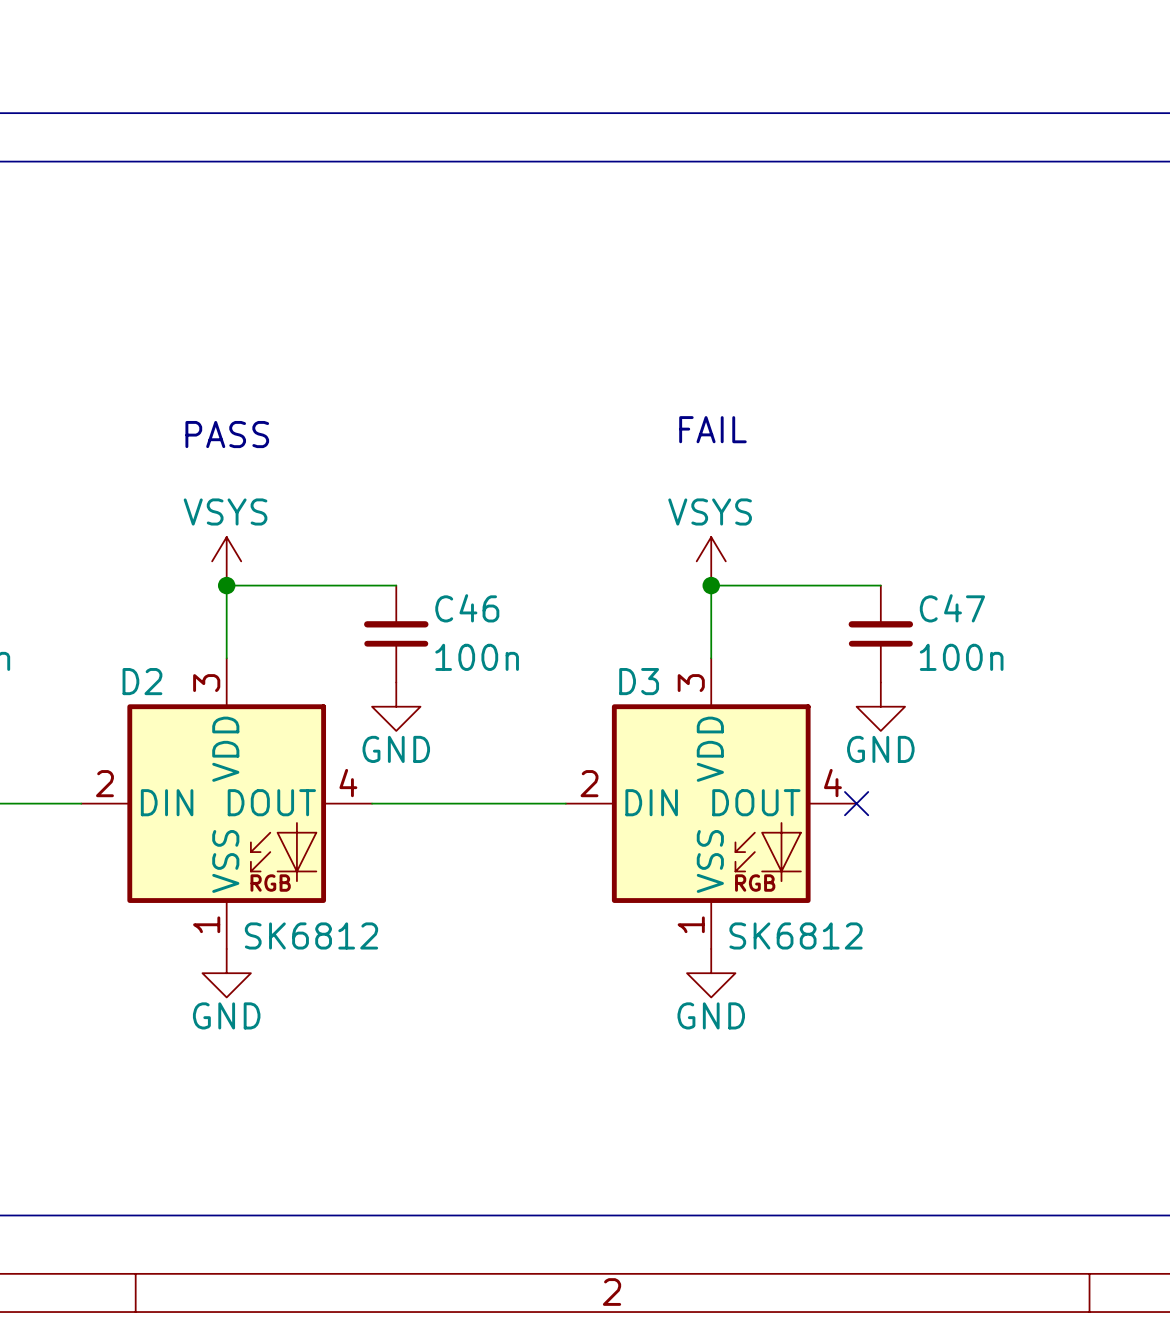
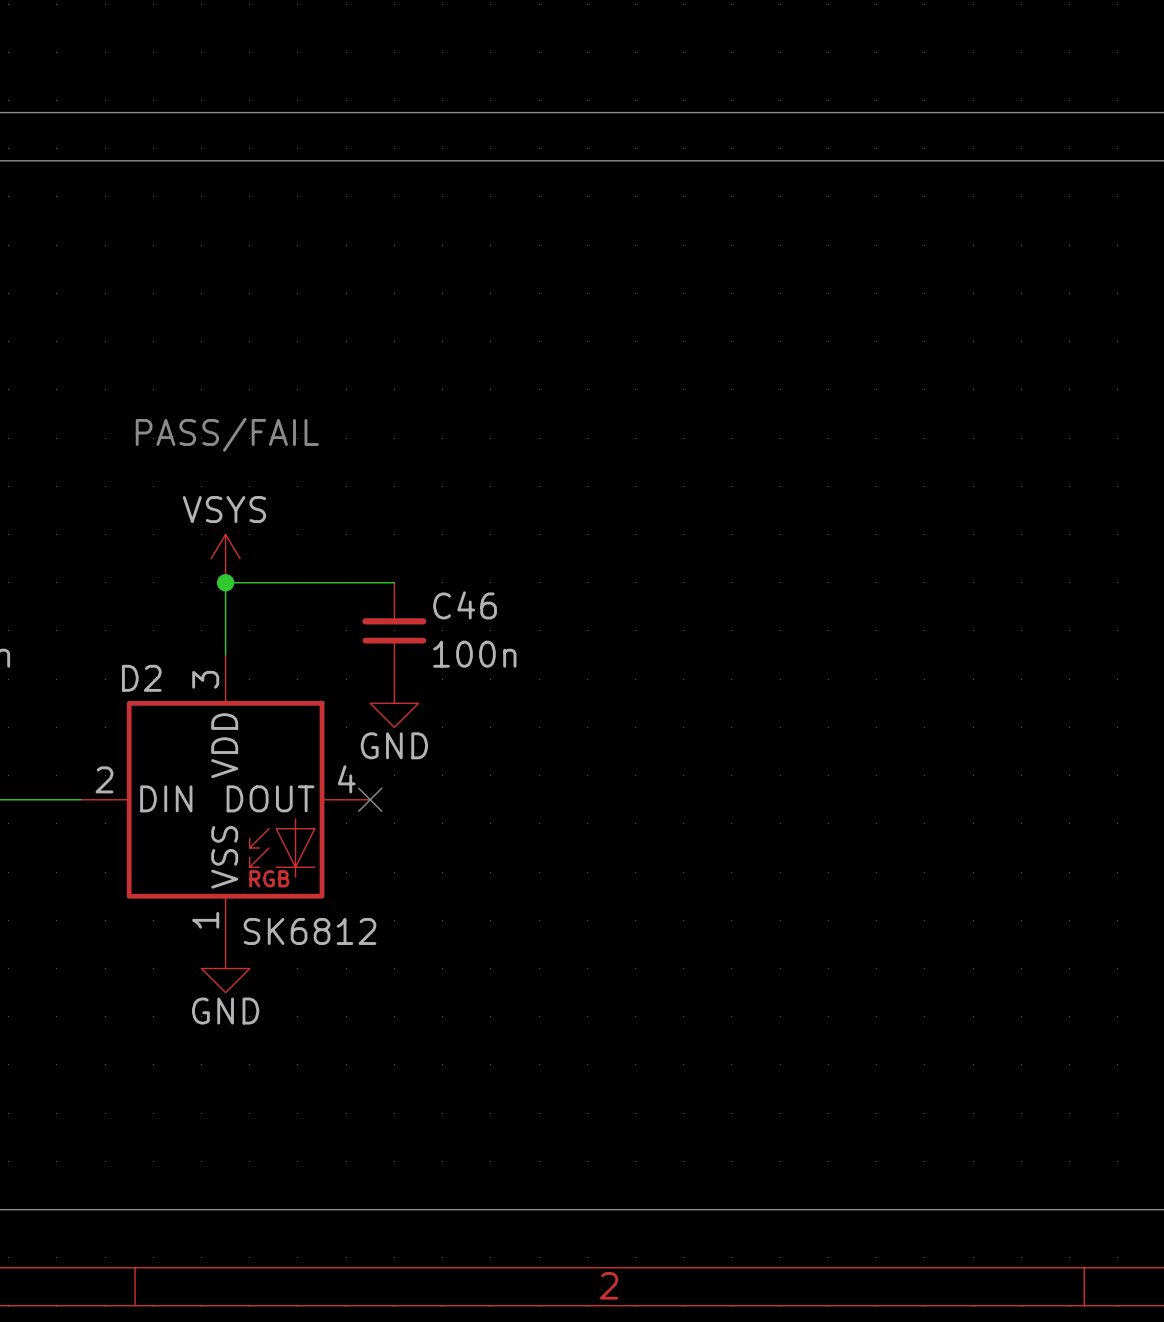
text: FAIL (712, 429) -> none
text: PASS (227, 434) -> PASS/FAIL (227, 434)
power symbol: VSYS (711, 561) -> none
junction: (711, 585) -> none
wire: (880, 585) (711, 585) (711, 658) -> none
C47: 100n (880, 634) -> none
power symbol: GND (880, 706) -> none
wire: (372, 803) (565, 803) -> none
no-connect mark: none -> (370, 799)
D3: SK6812 (711, 803) -> none
no-connect mark: (856, 803) -> none
power symbol: GND (711, 973) -> none

